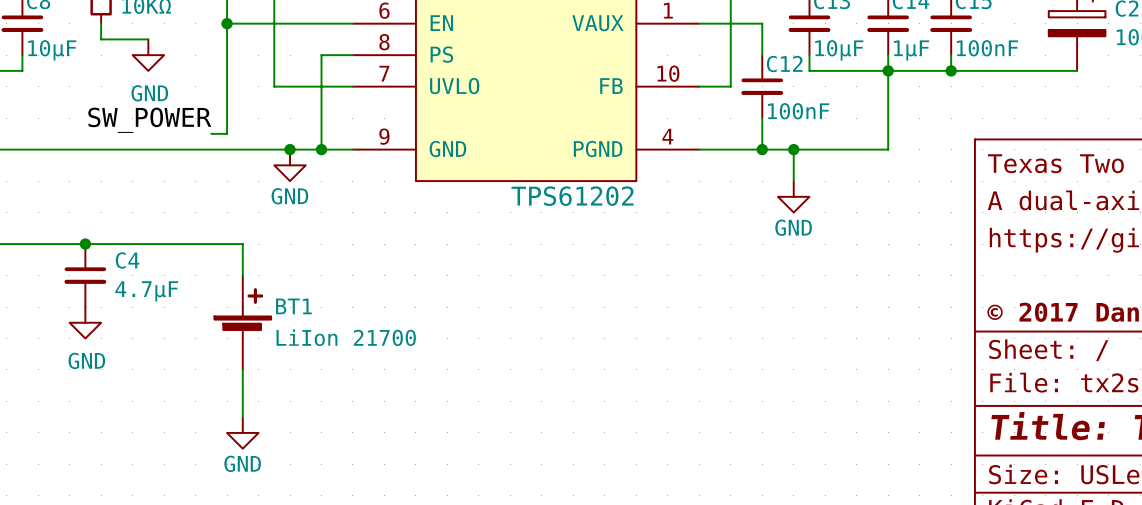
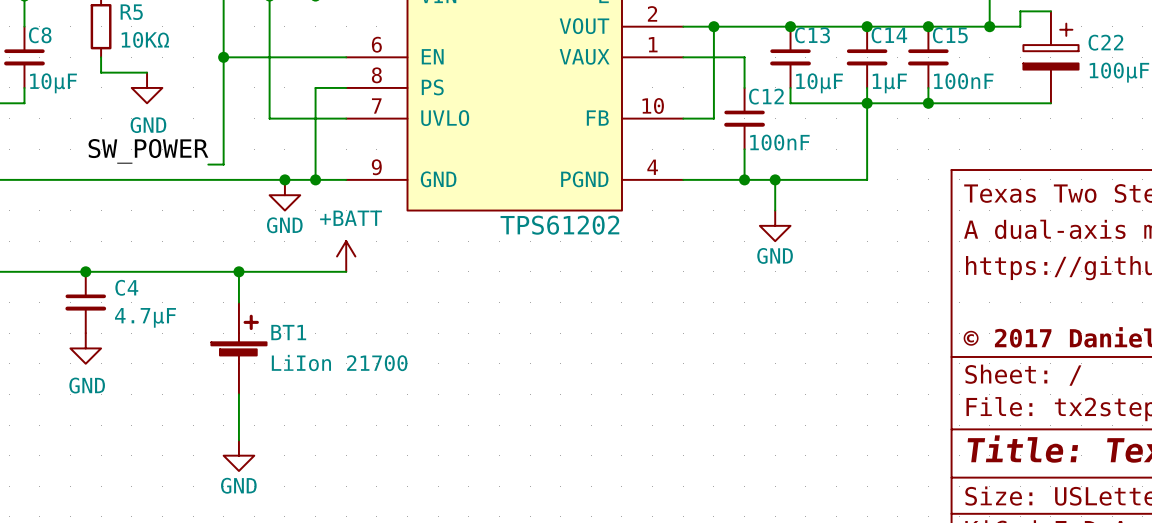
power symbol: none -> +BATT (346, 256)
wire: none -> (238, 271) (346, 271)
junction: none -> (238, 271)

